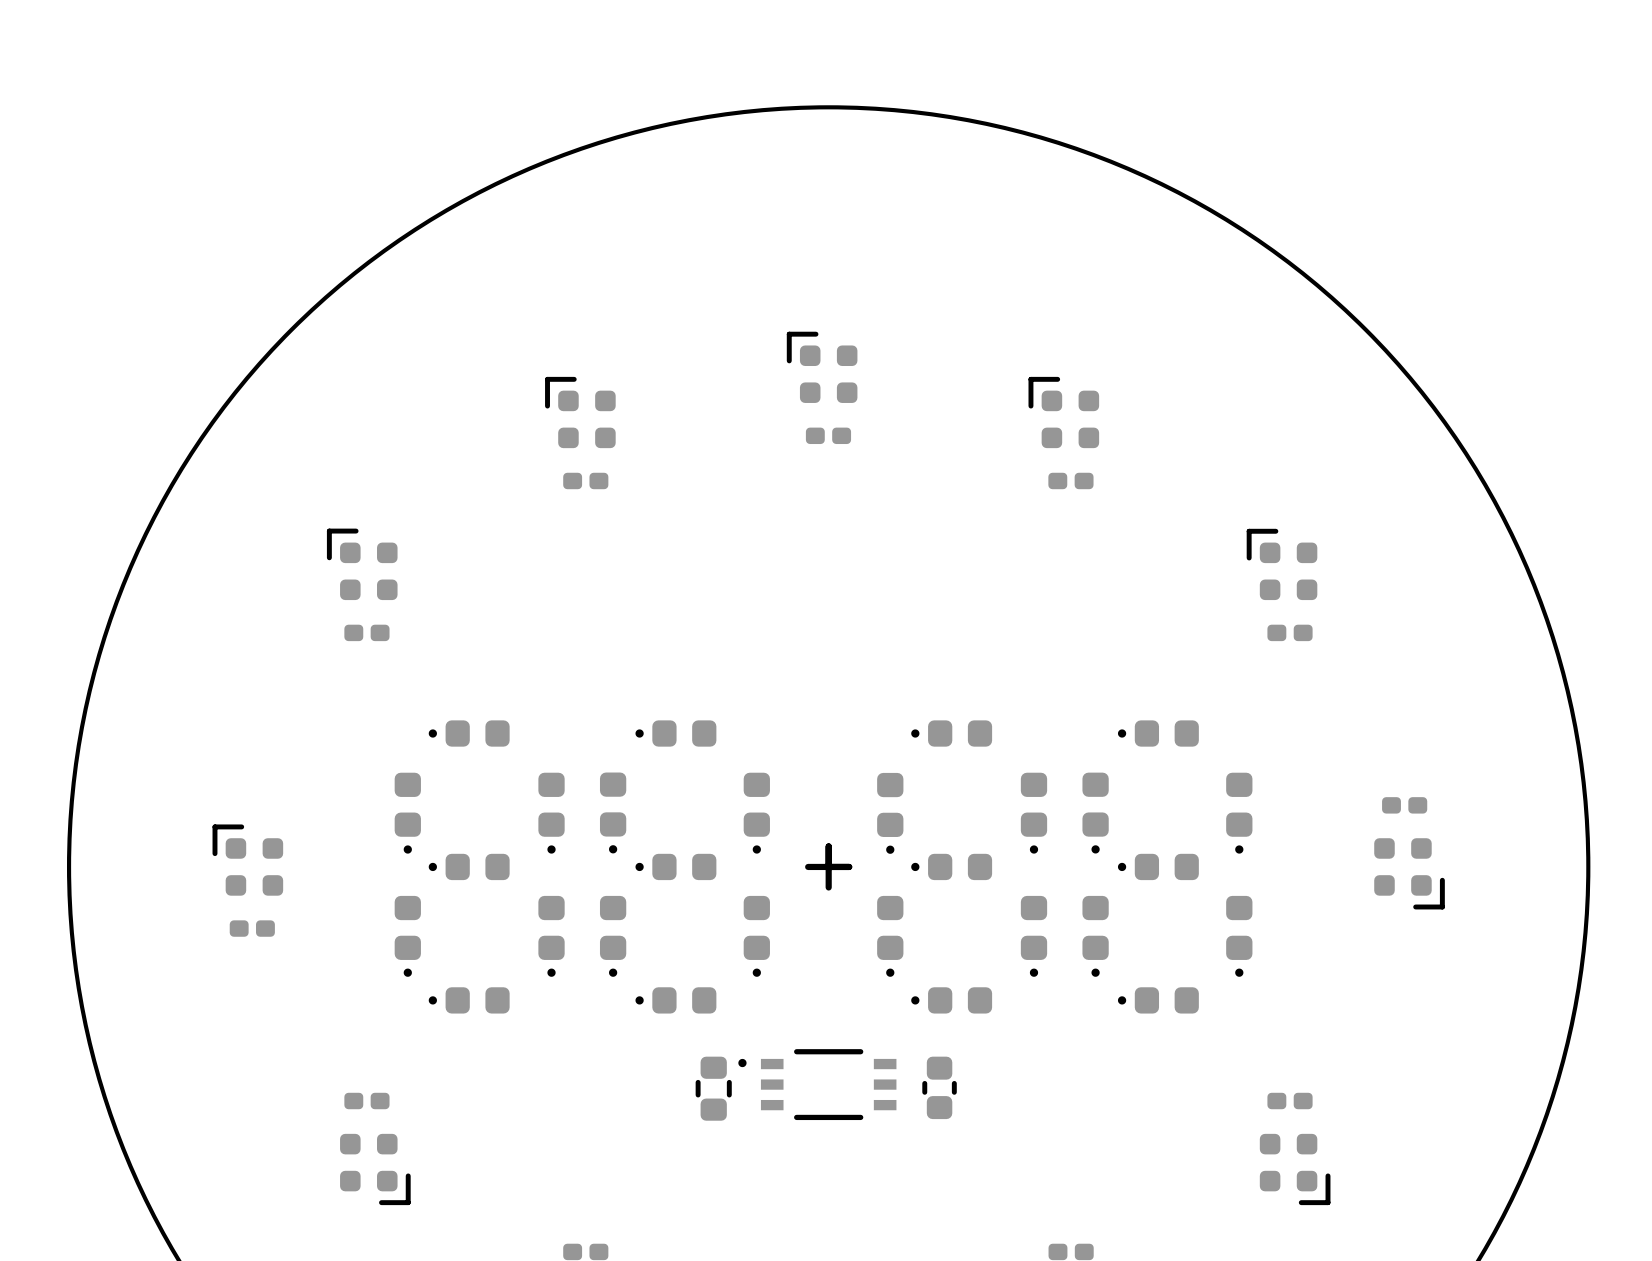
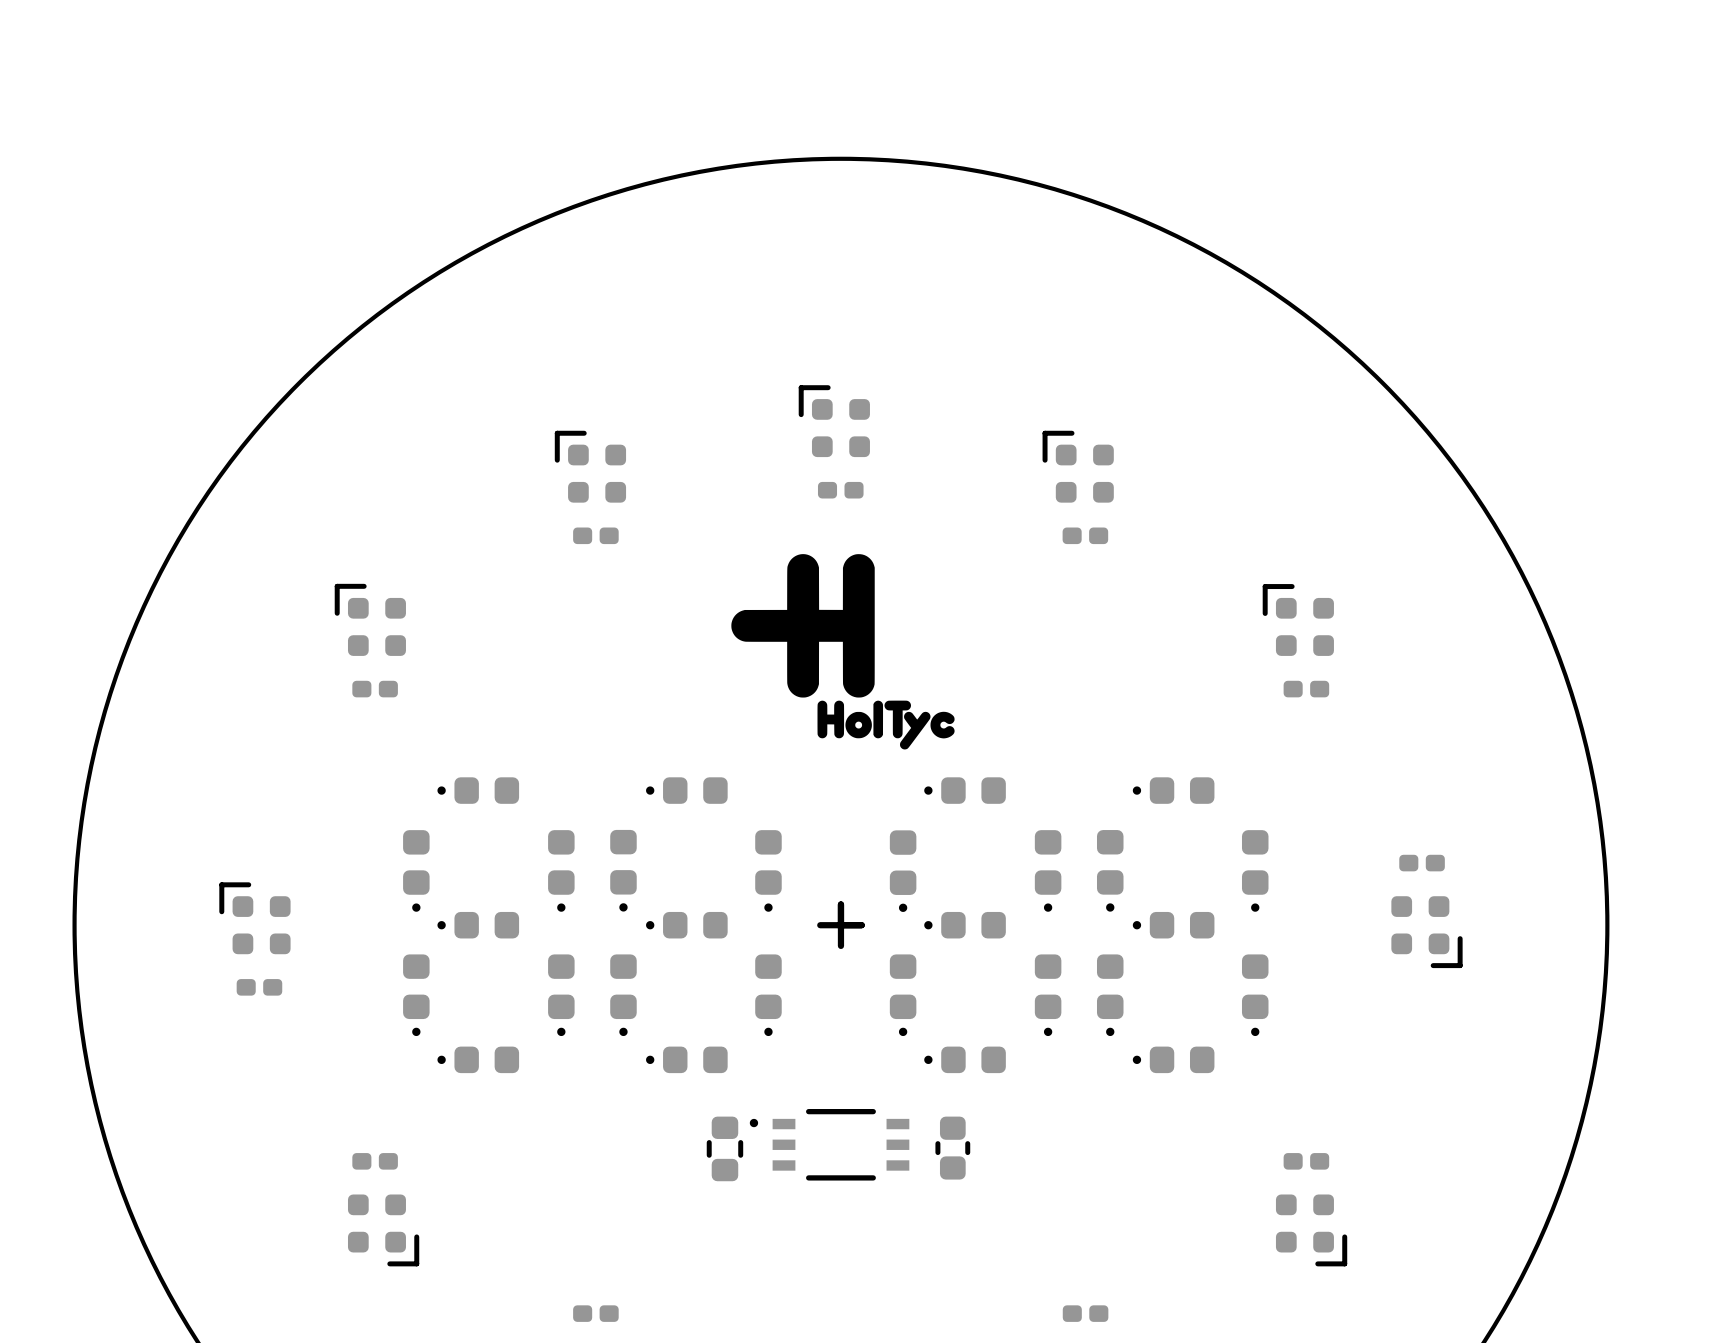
drawing: none -> [731, 554, 955, 750]

